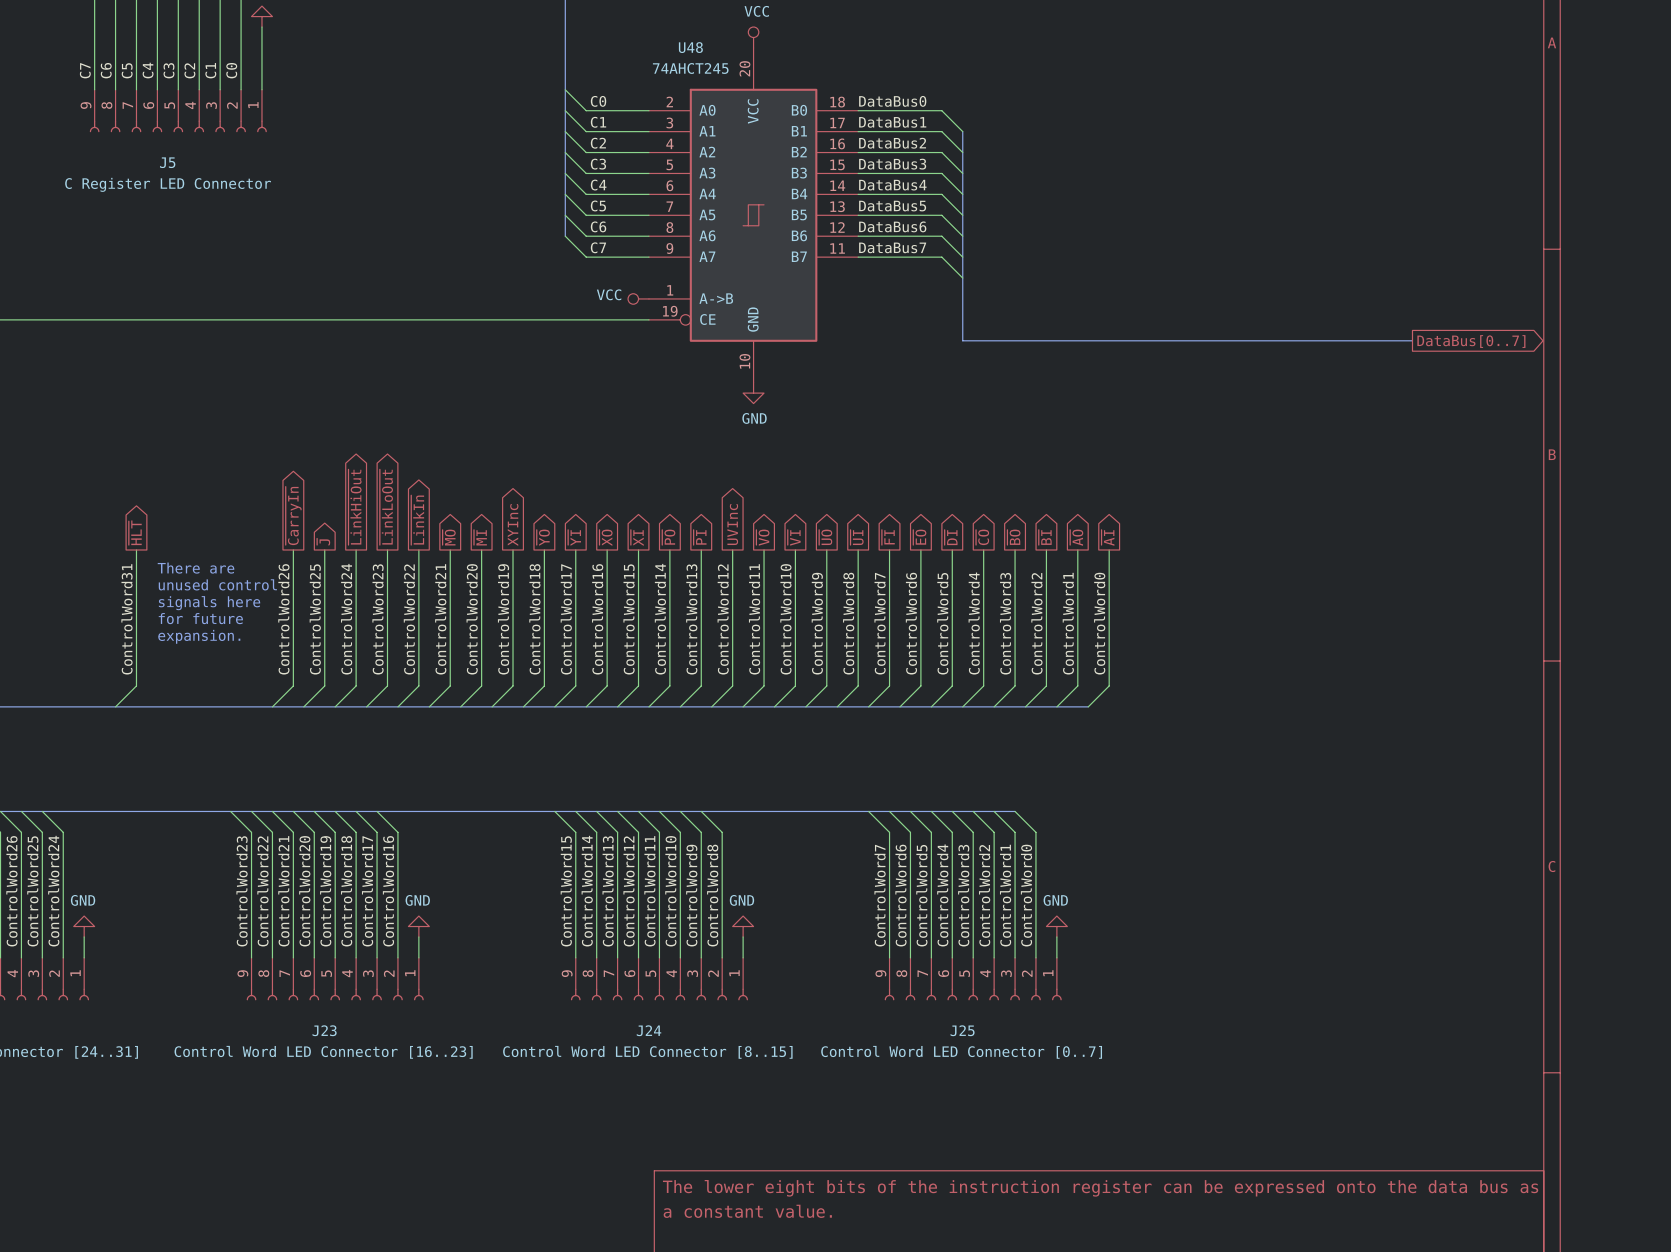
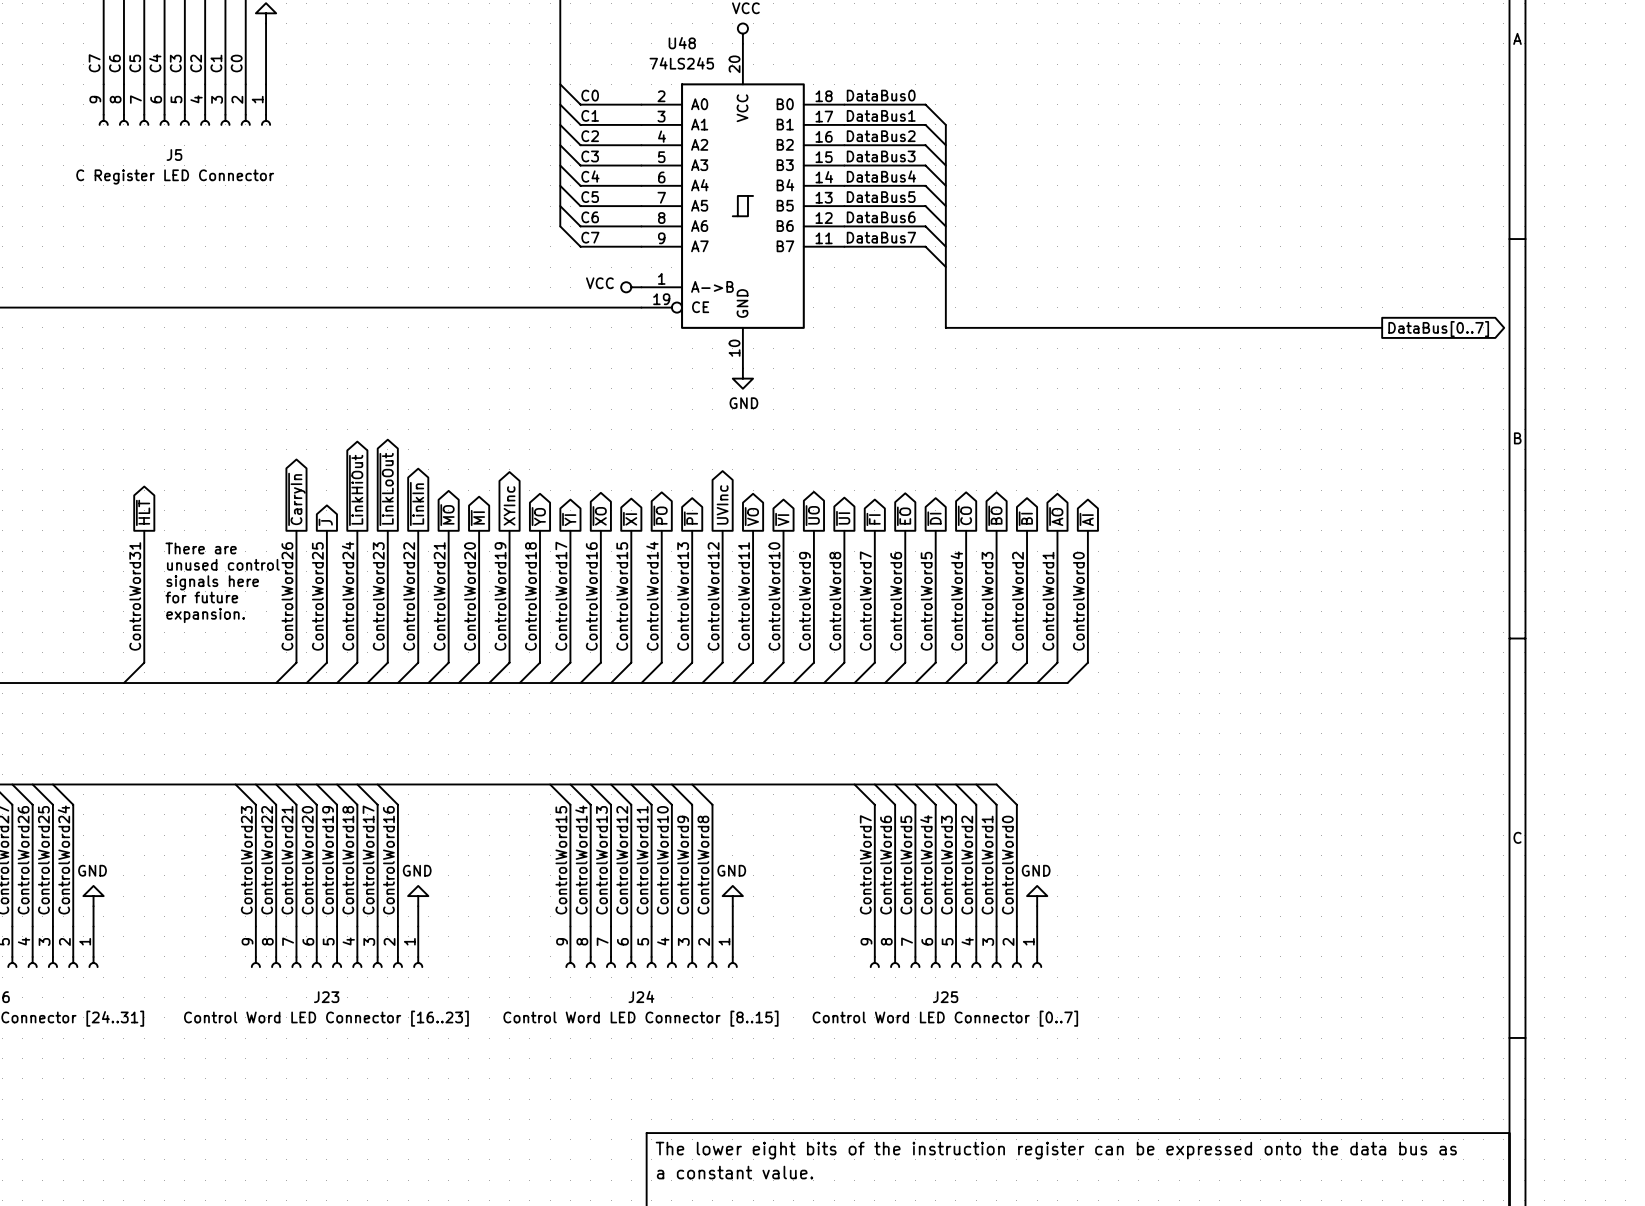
U48 value: 74AHCT245 (690, 68) -> 74LS245 (681, 63)

